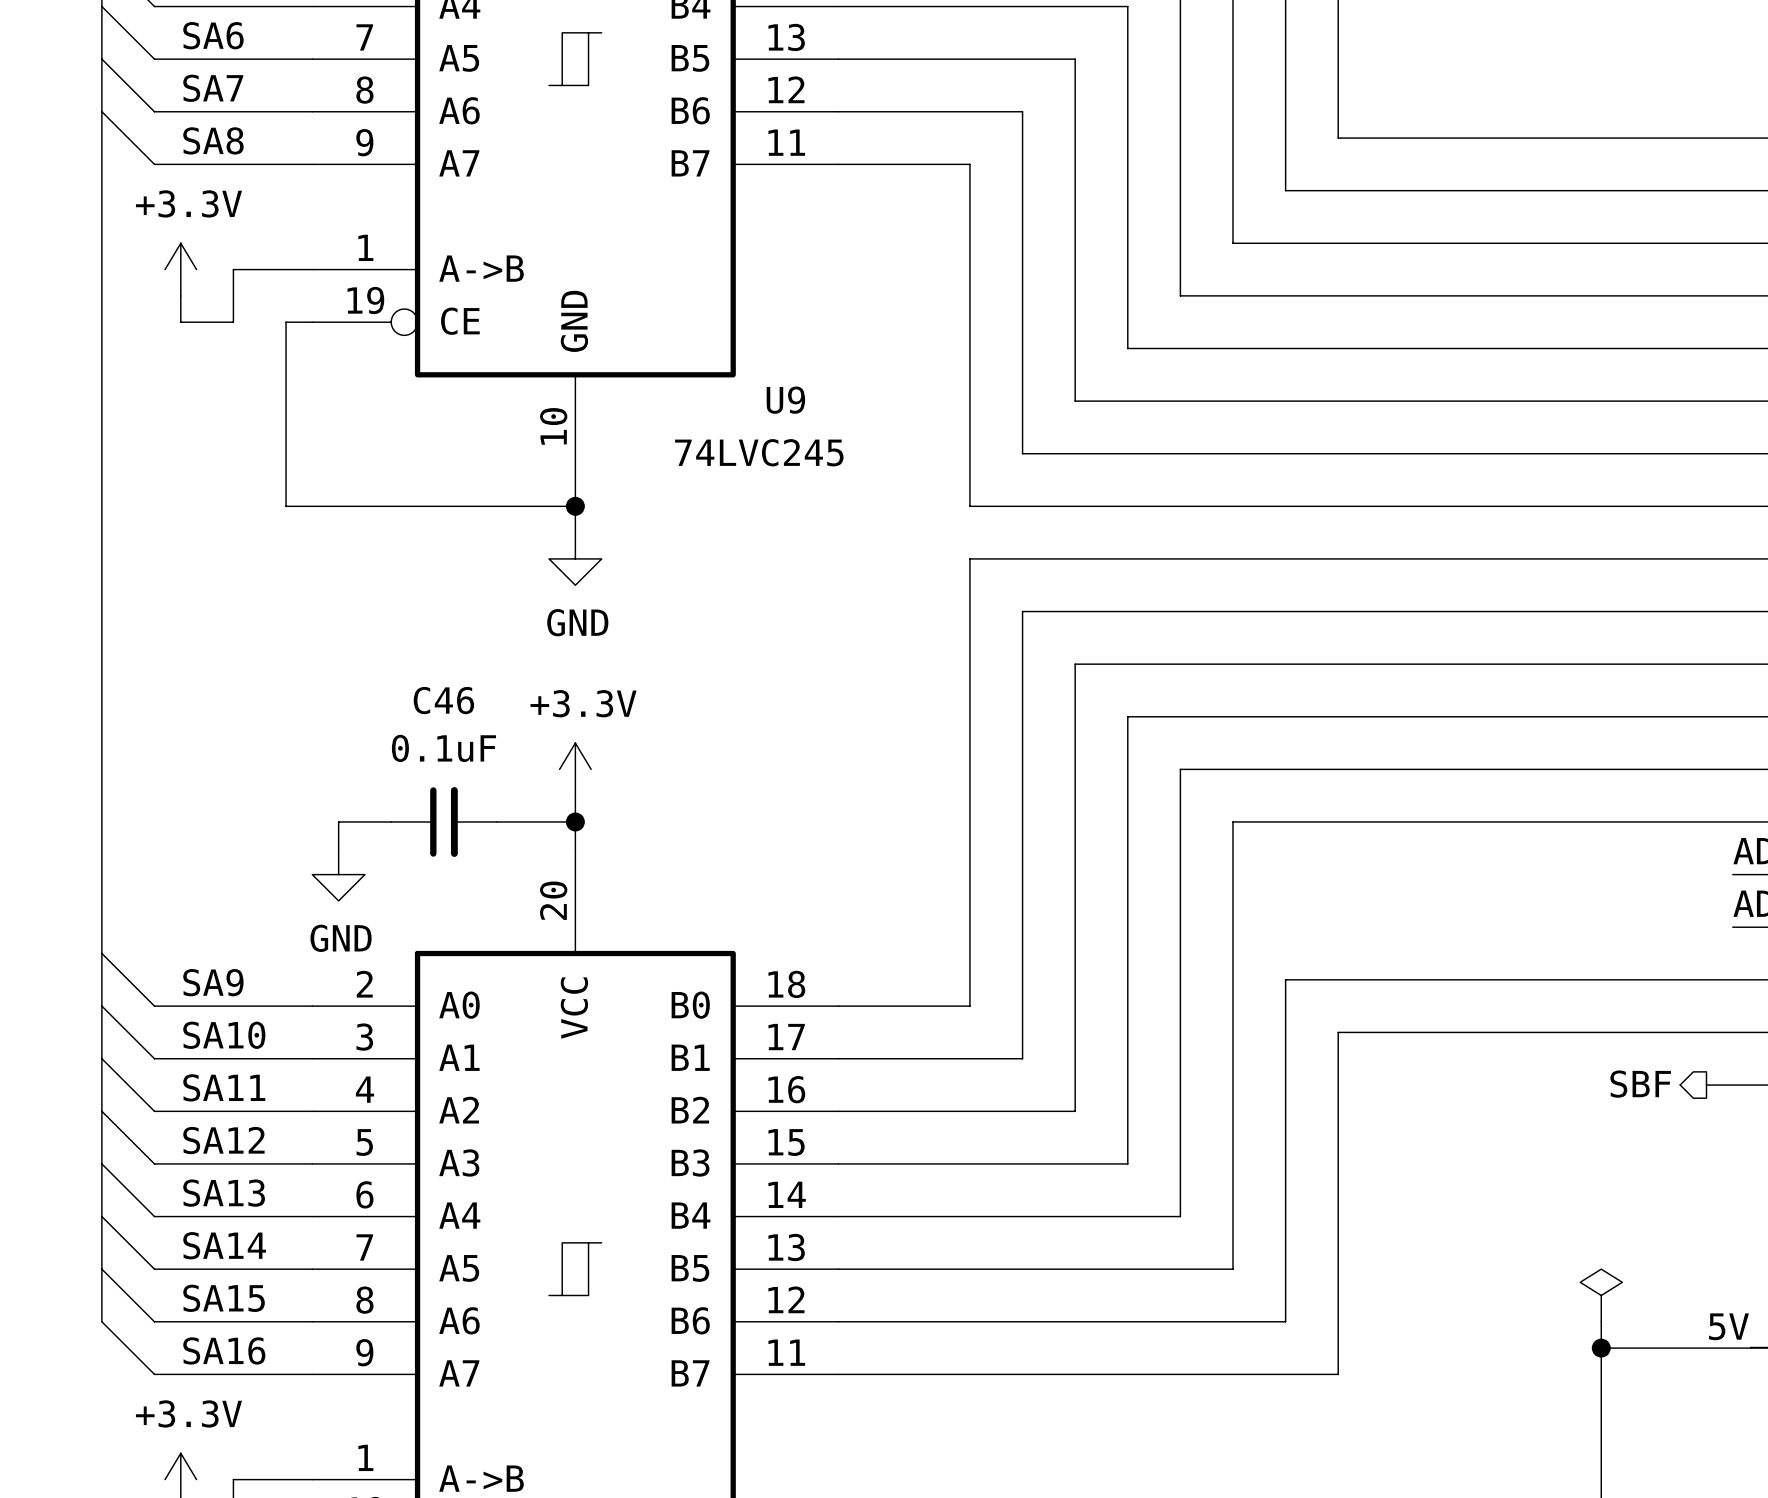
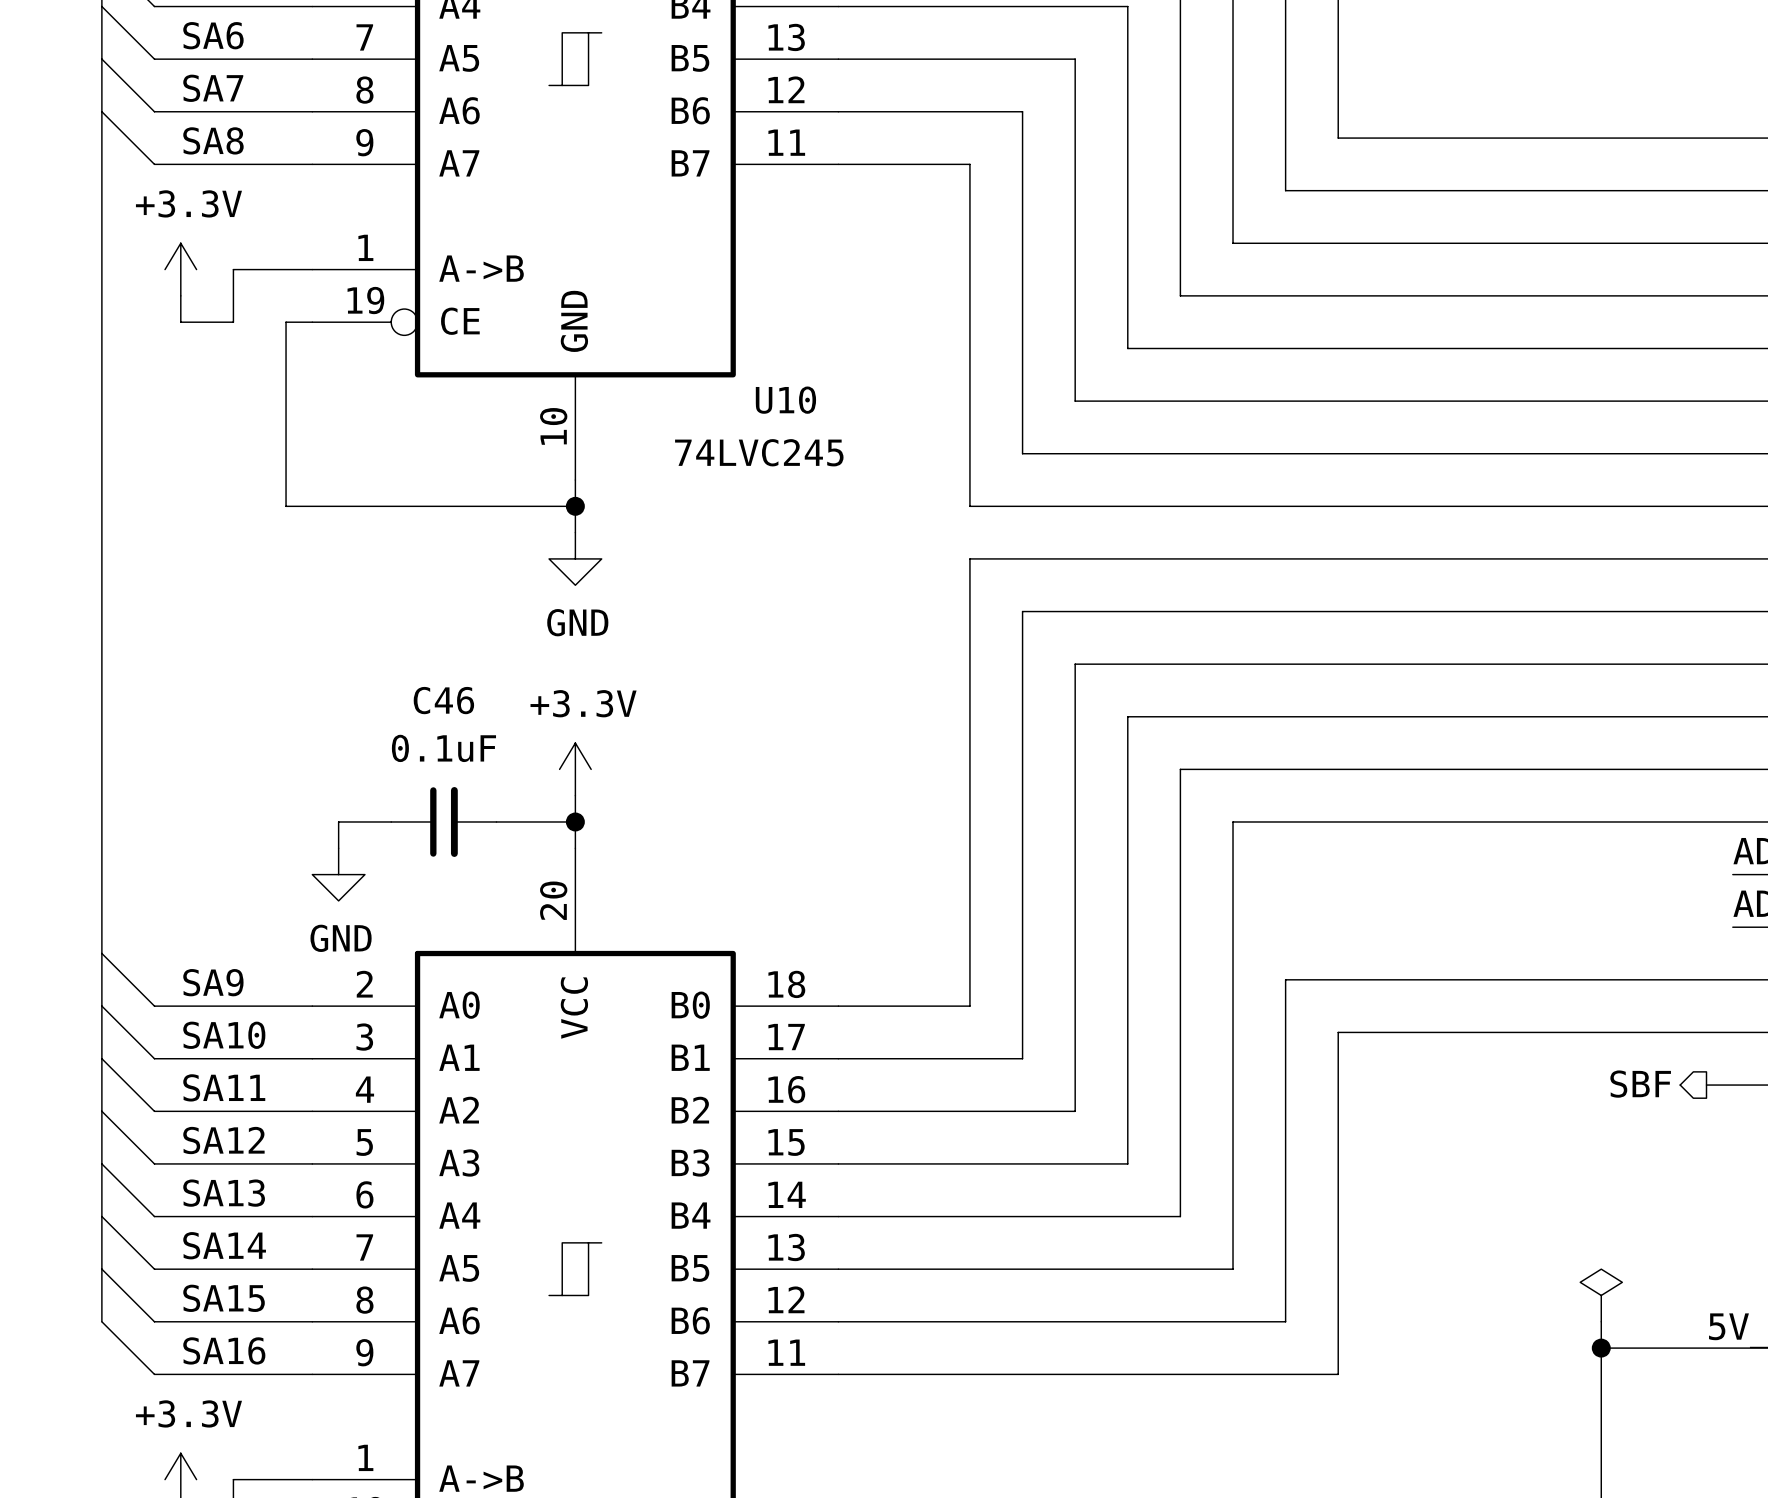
U9 name: U9 (785, 400) -> U10 (785, 400)

